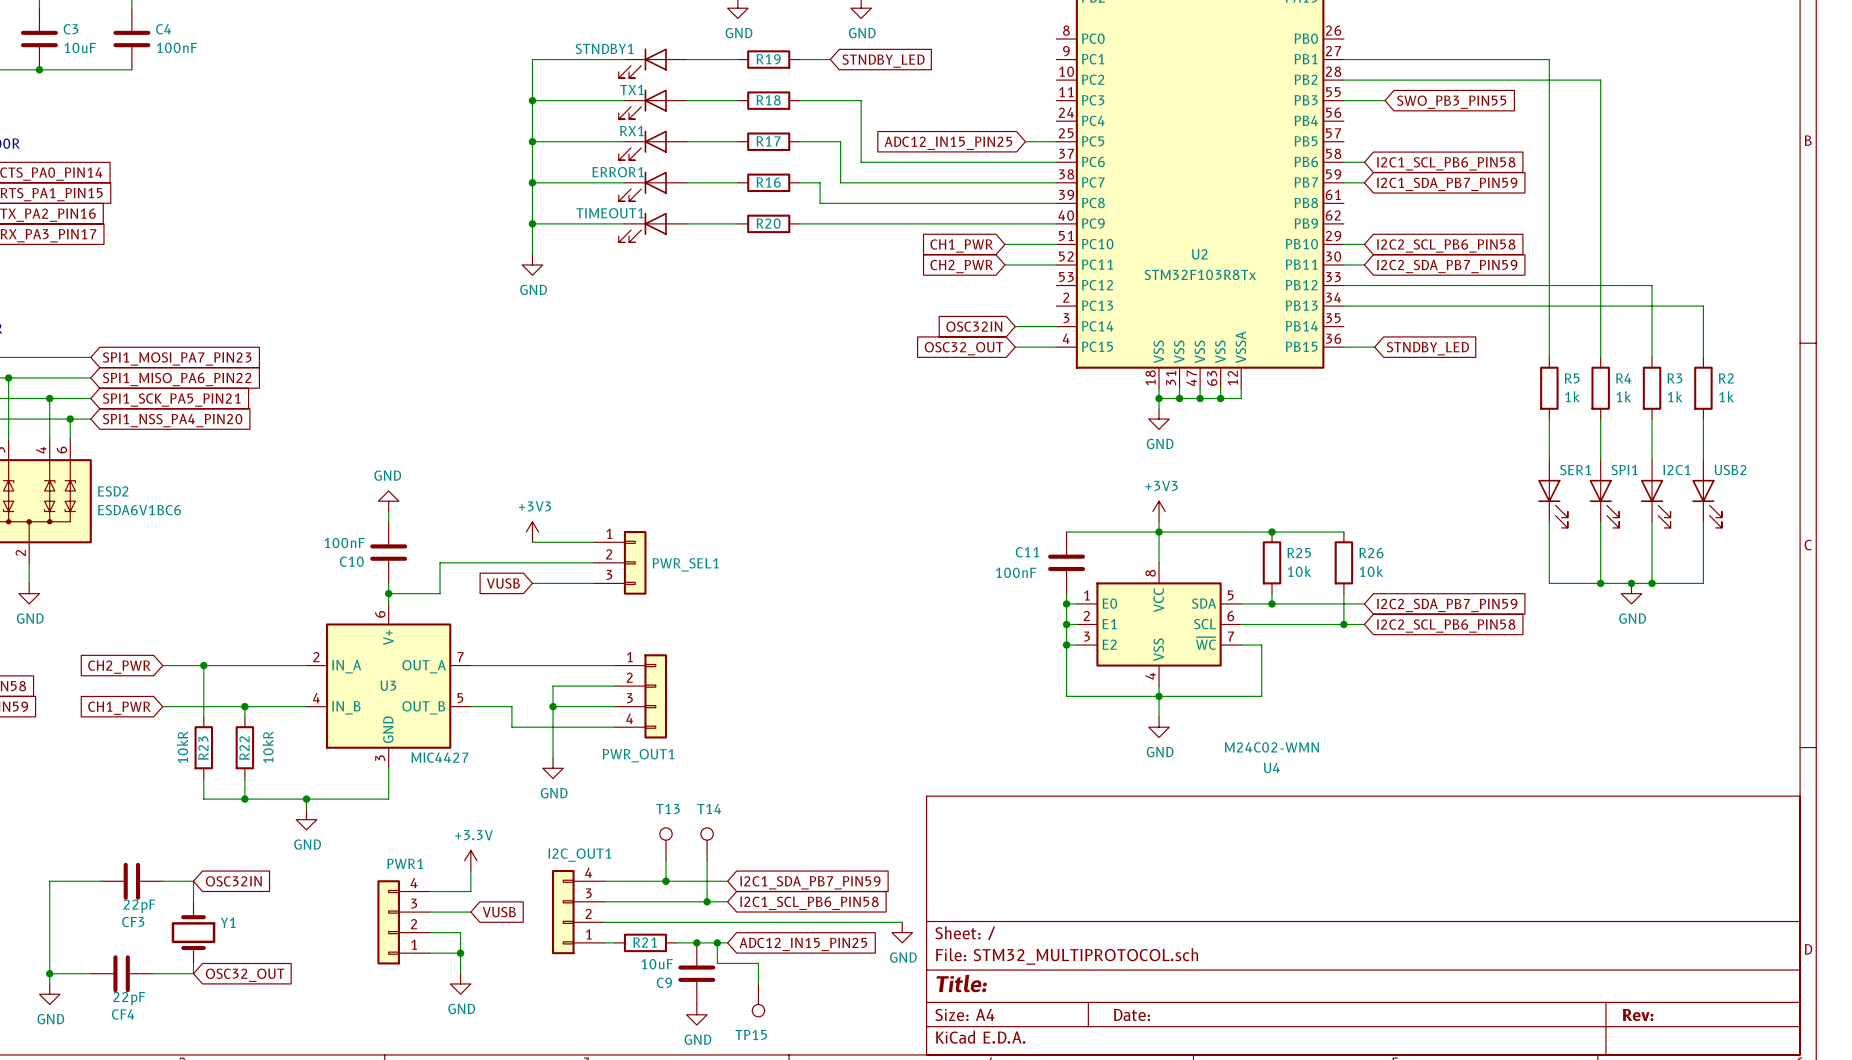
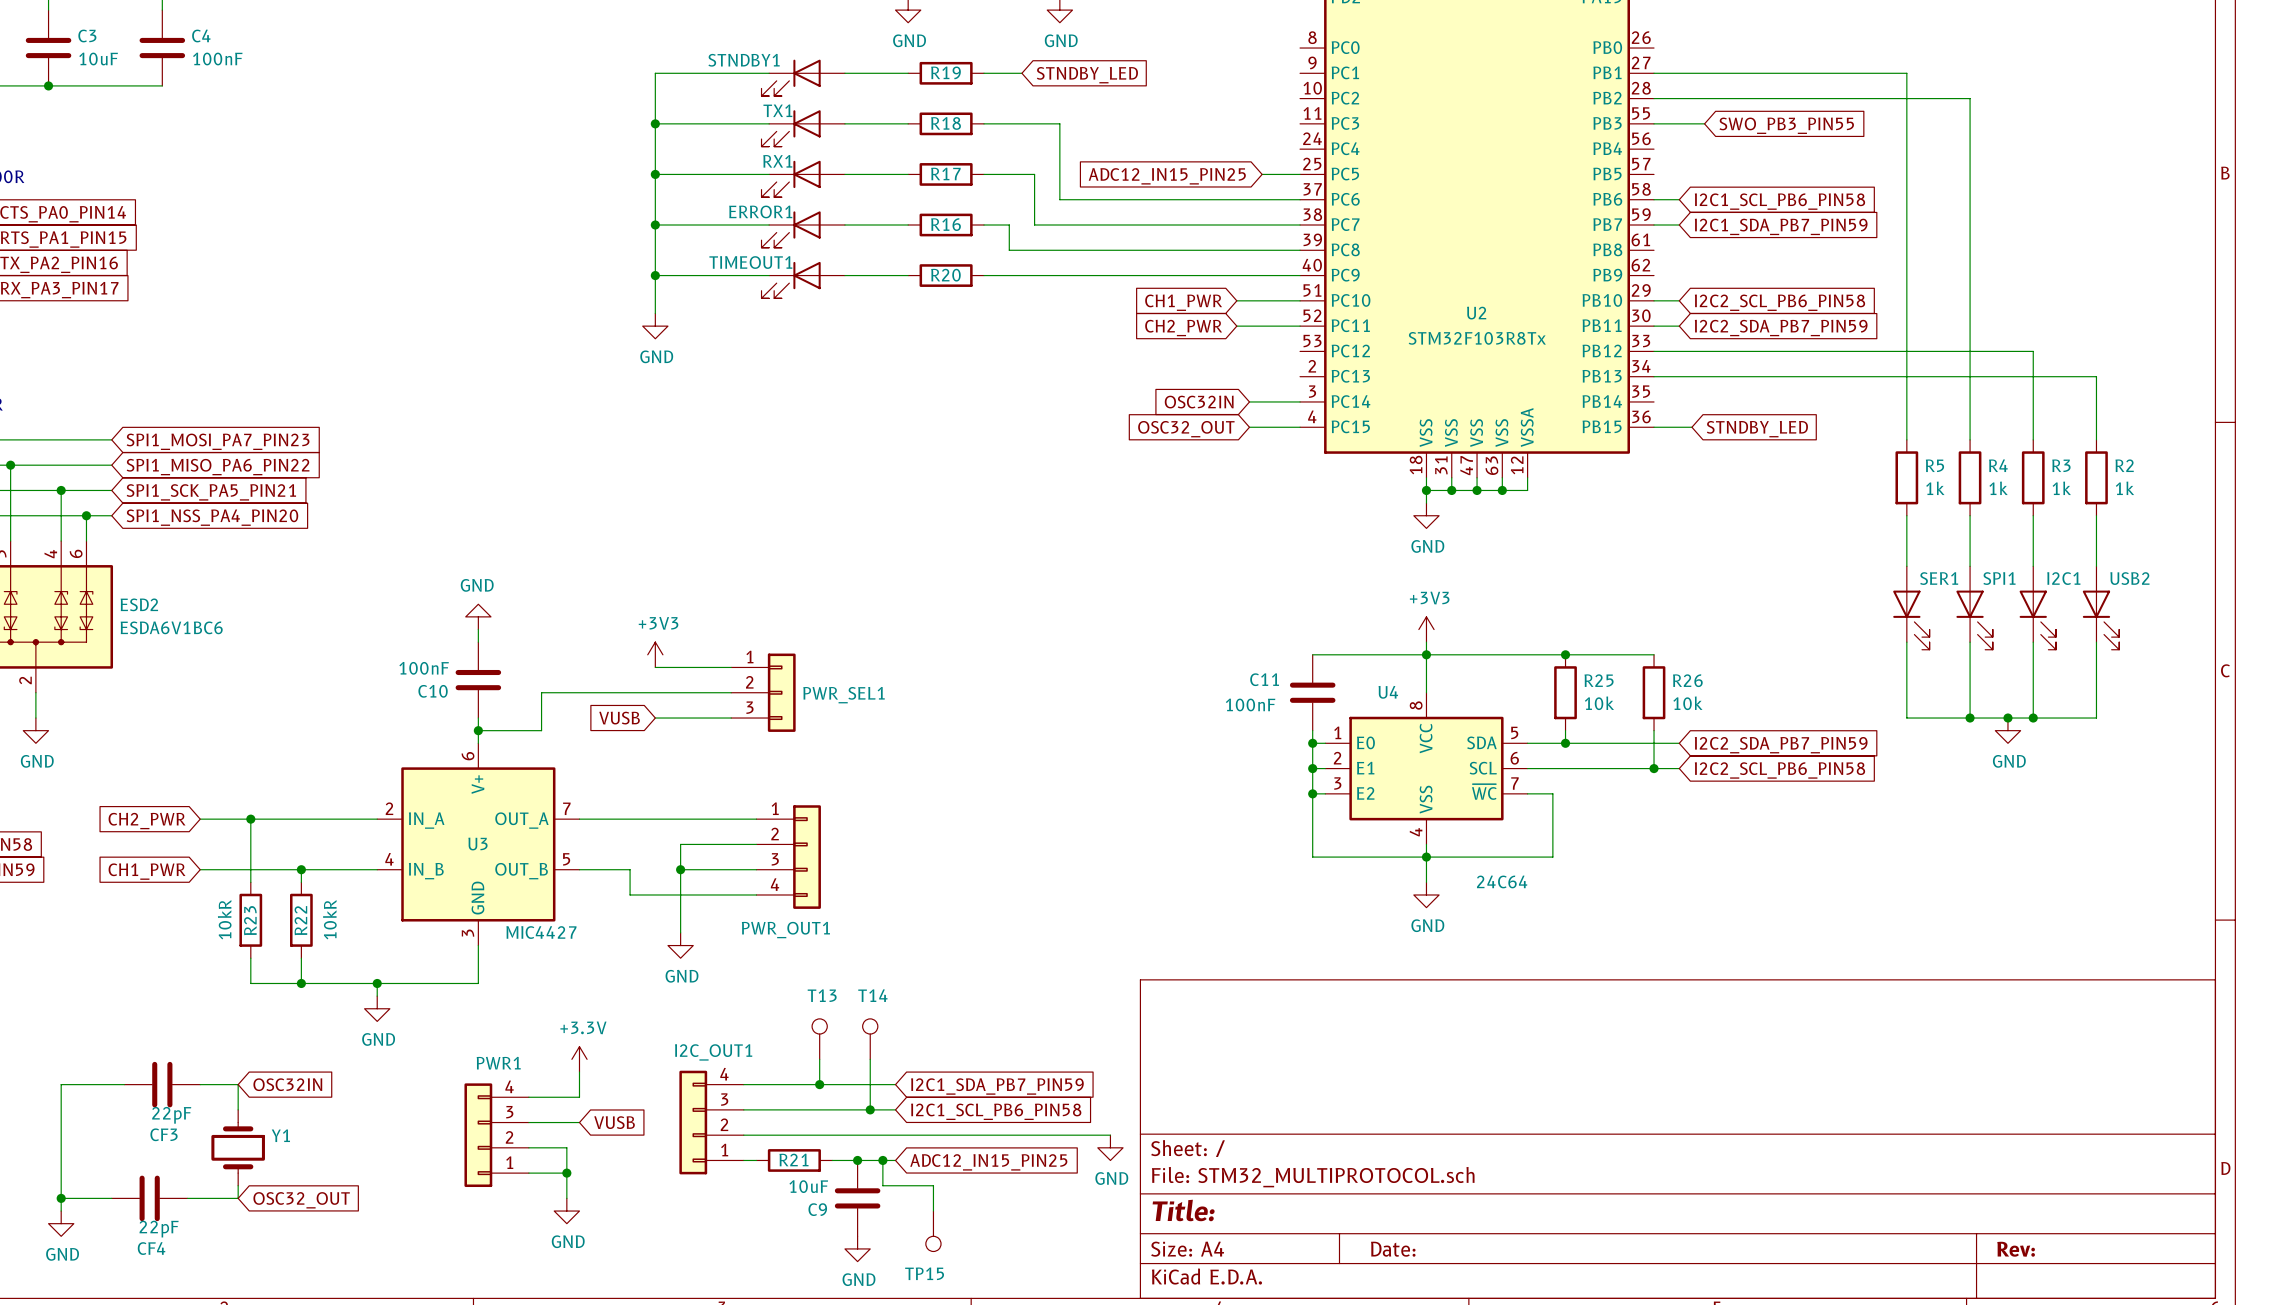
U4 value: M24C02-WMN (1271, 747) -> 24C64 (1502, 881)
U4 name position: U4 (1271, 767) -> U4 (1388, 692)

